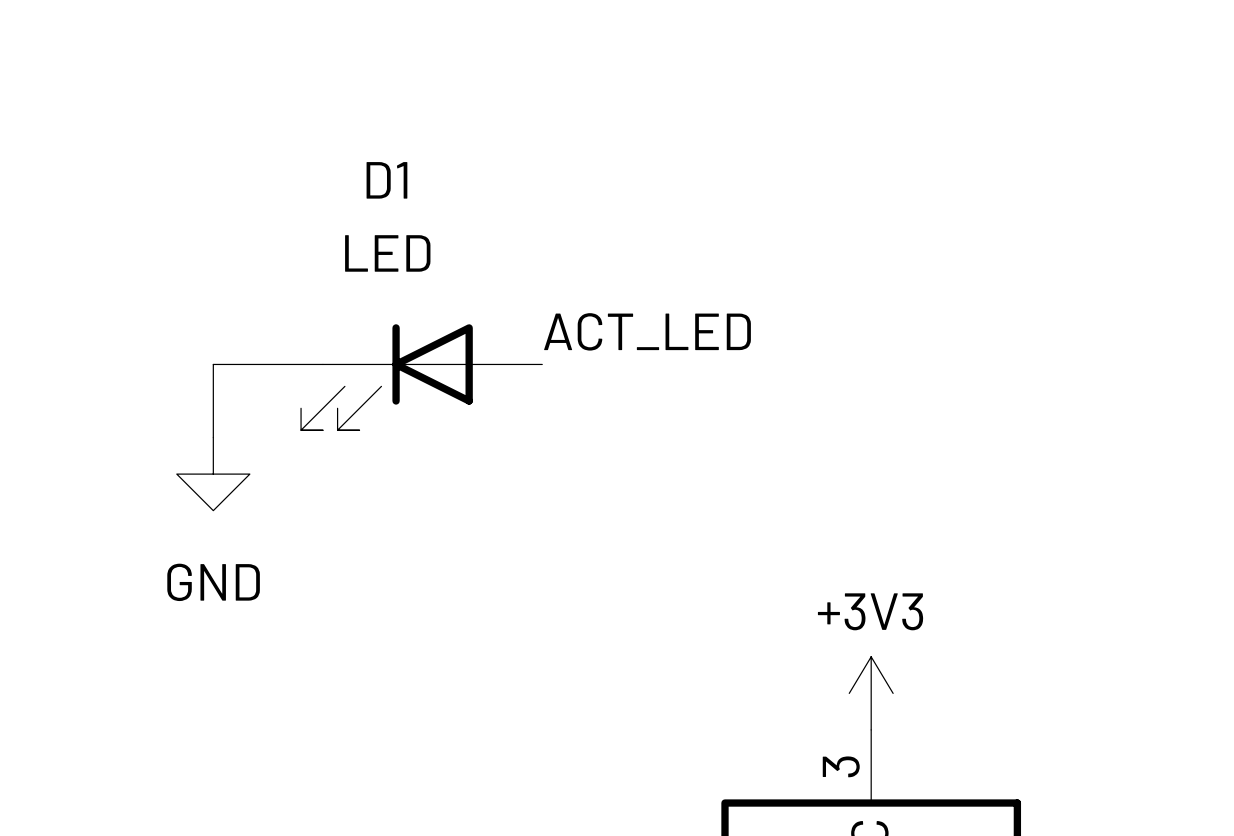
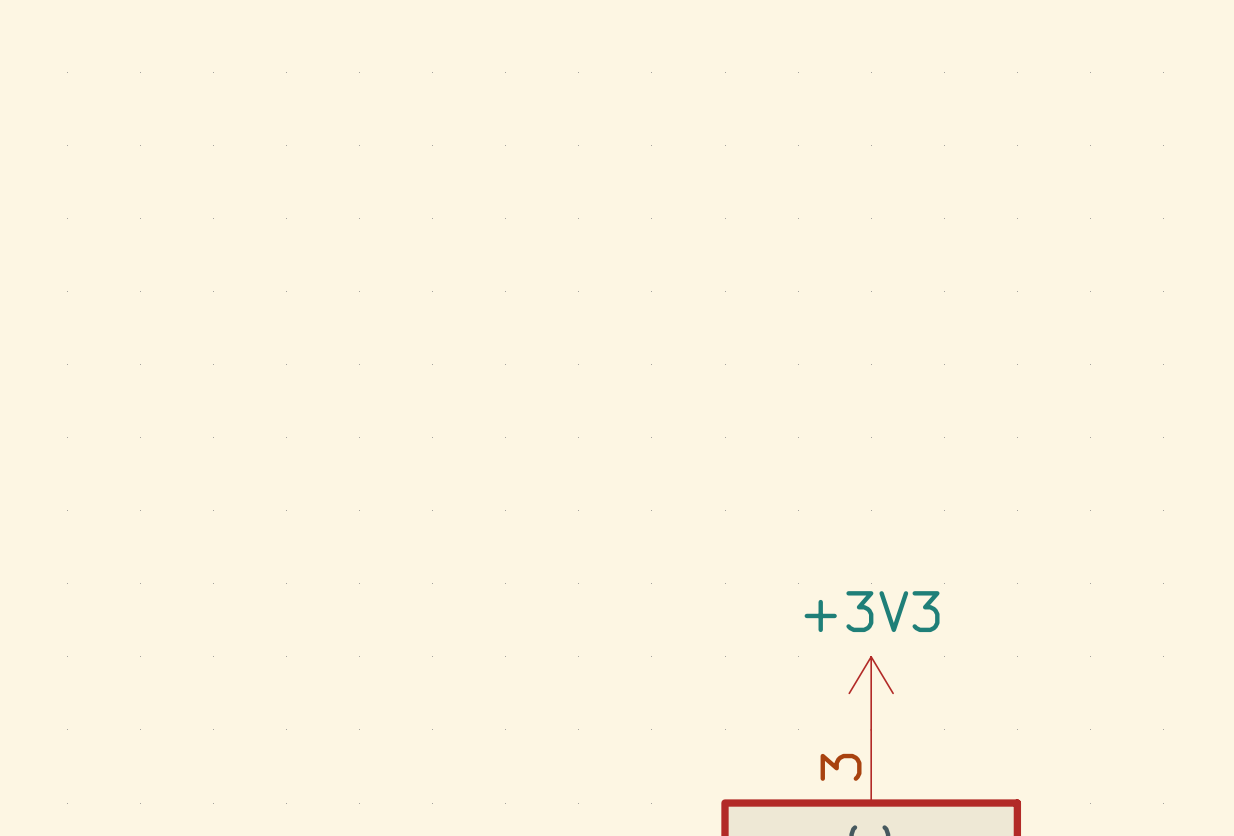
label: ACT_LED (647, 331) -> none
wire: (322, 364) (213, 364) (213, 437) -> none
D1: LED (421, 377) -> none
power symbol: GND (213, 474) -> none

